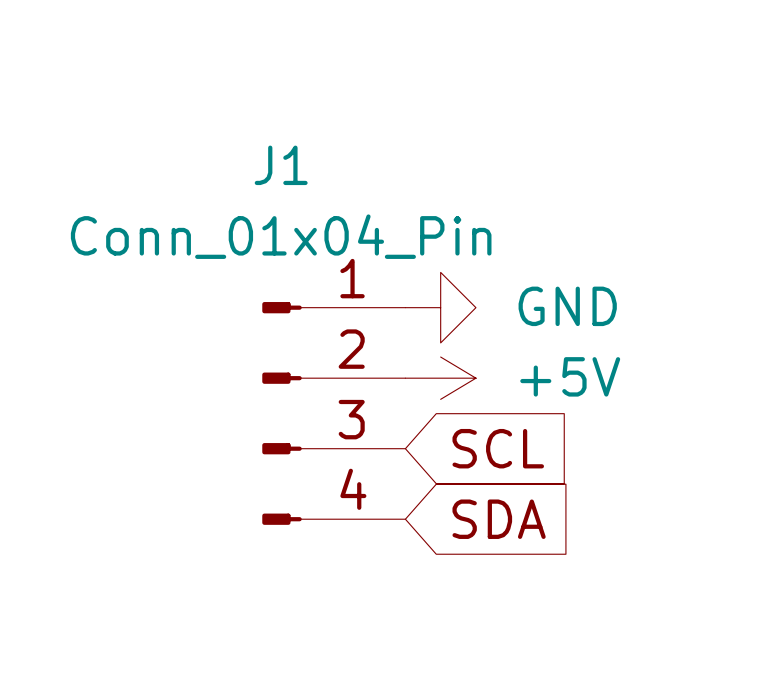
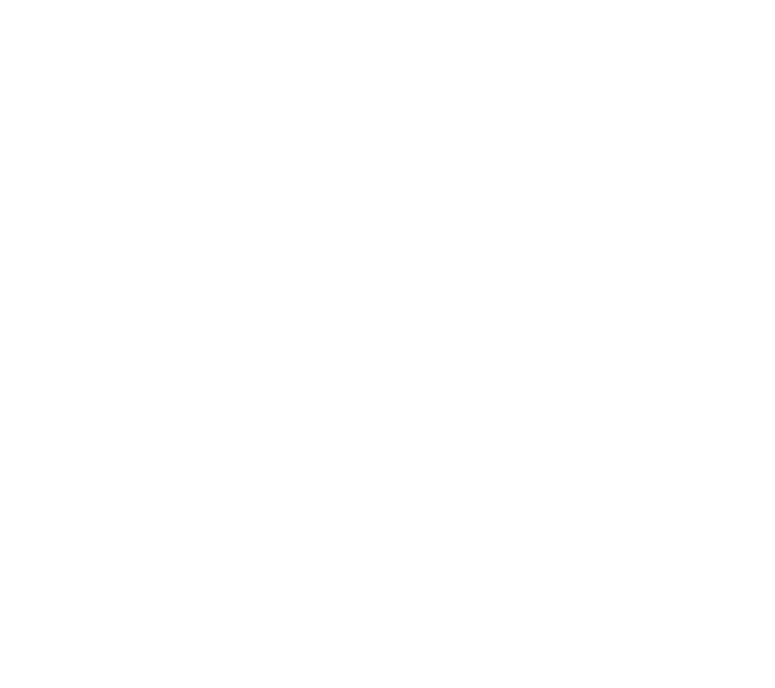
power symbol: GND (440, 307) -> none
power symbol: +5V (440, 378) -> none
J1: Conn_01x04_Pin (333, 413) -> none
global label: SCL (498, 448) -> none
global label: SDA (499, 519) -> none

